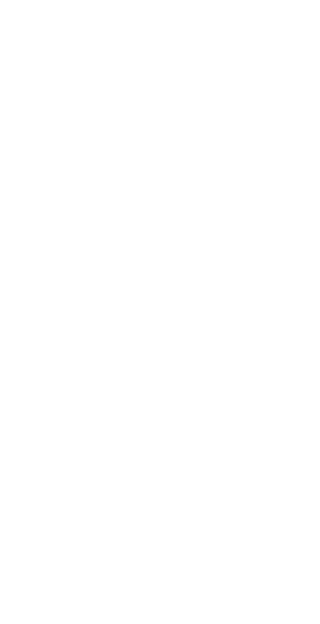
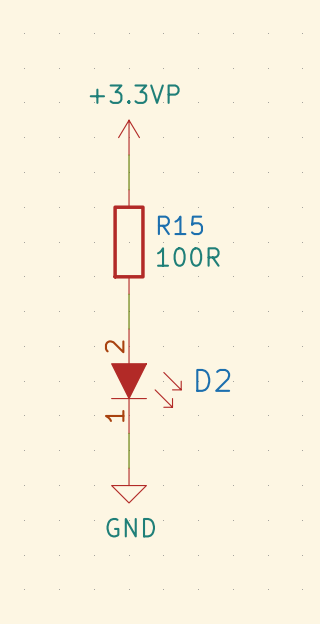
power symbol: none -> +3.3VP (129, 137)
wire: none -> (129, 155) (129, 189)
R15: none -> 100R (129, 242)
wire: none -> (129, 294) (129, 328)
D2: none -> (146, 381)
wire: none -> (129, 433) (129, 468)
power symbol: none -> GND (129, 485)

